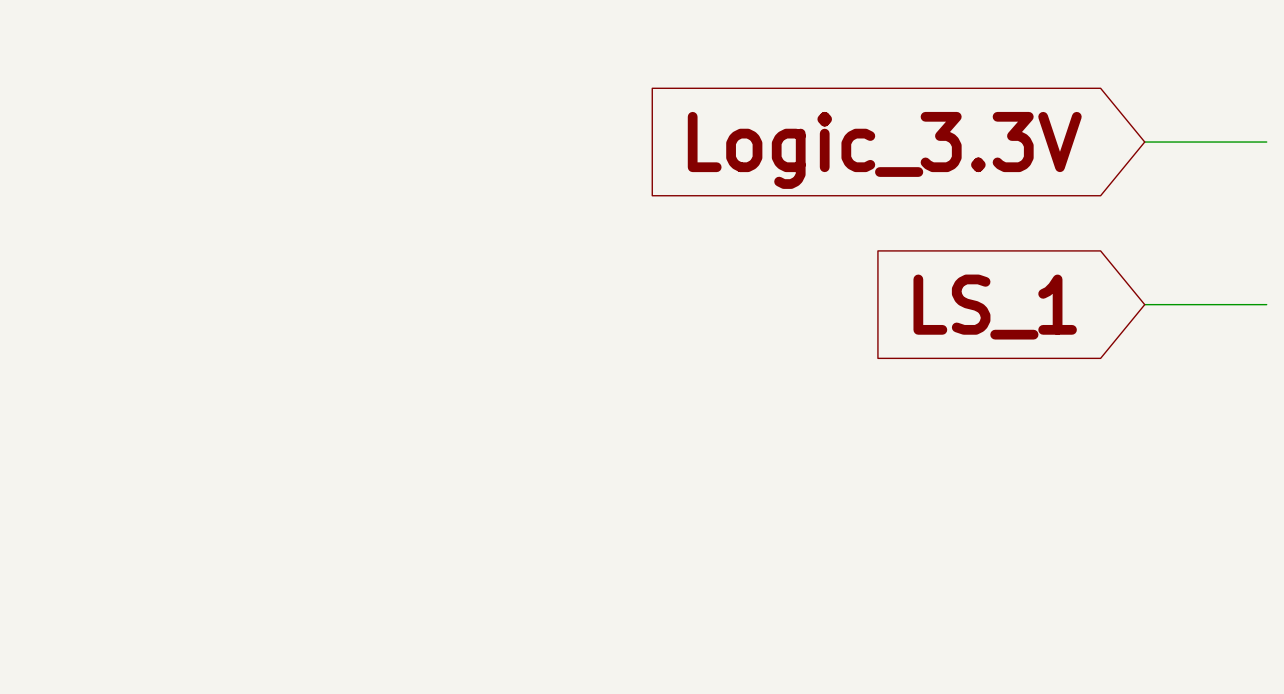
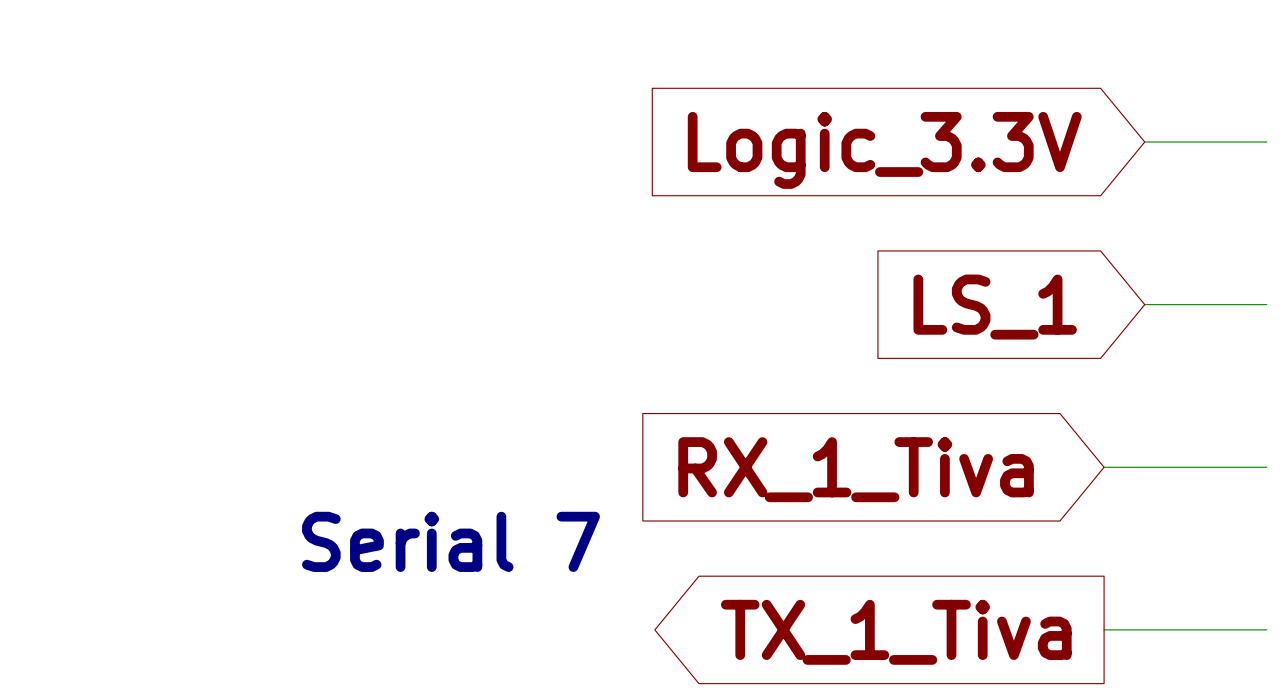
wire: none -> (1104, 467) (1266, 467)
global label: none -> RX_1_Tiva (856, 469)
text: none -> Serial 7 (450, 541)
wire: none -> (1104, 629) (1266, 629)
global label: none -> TX_1_Tiva (896, 632)

